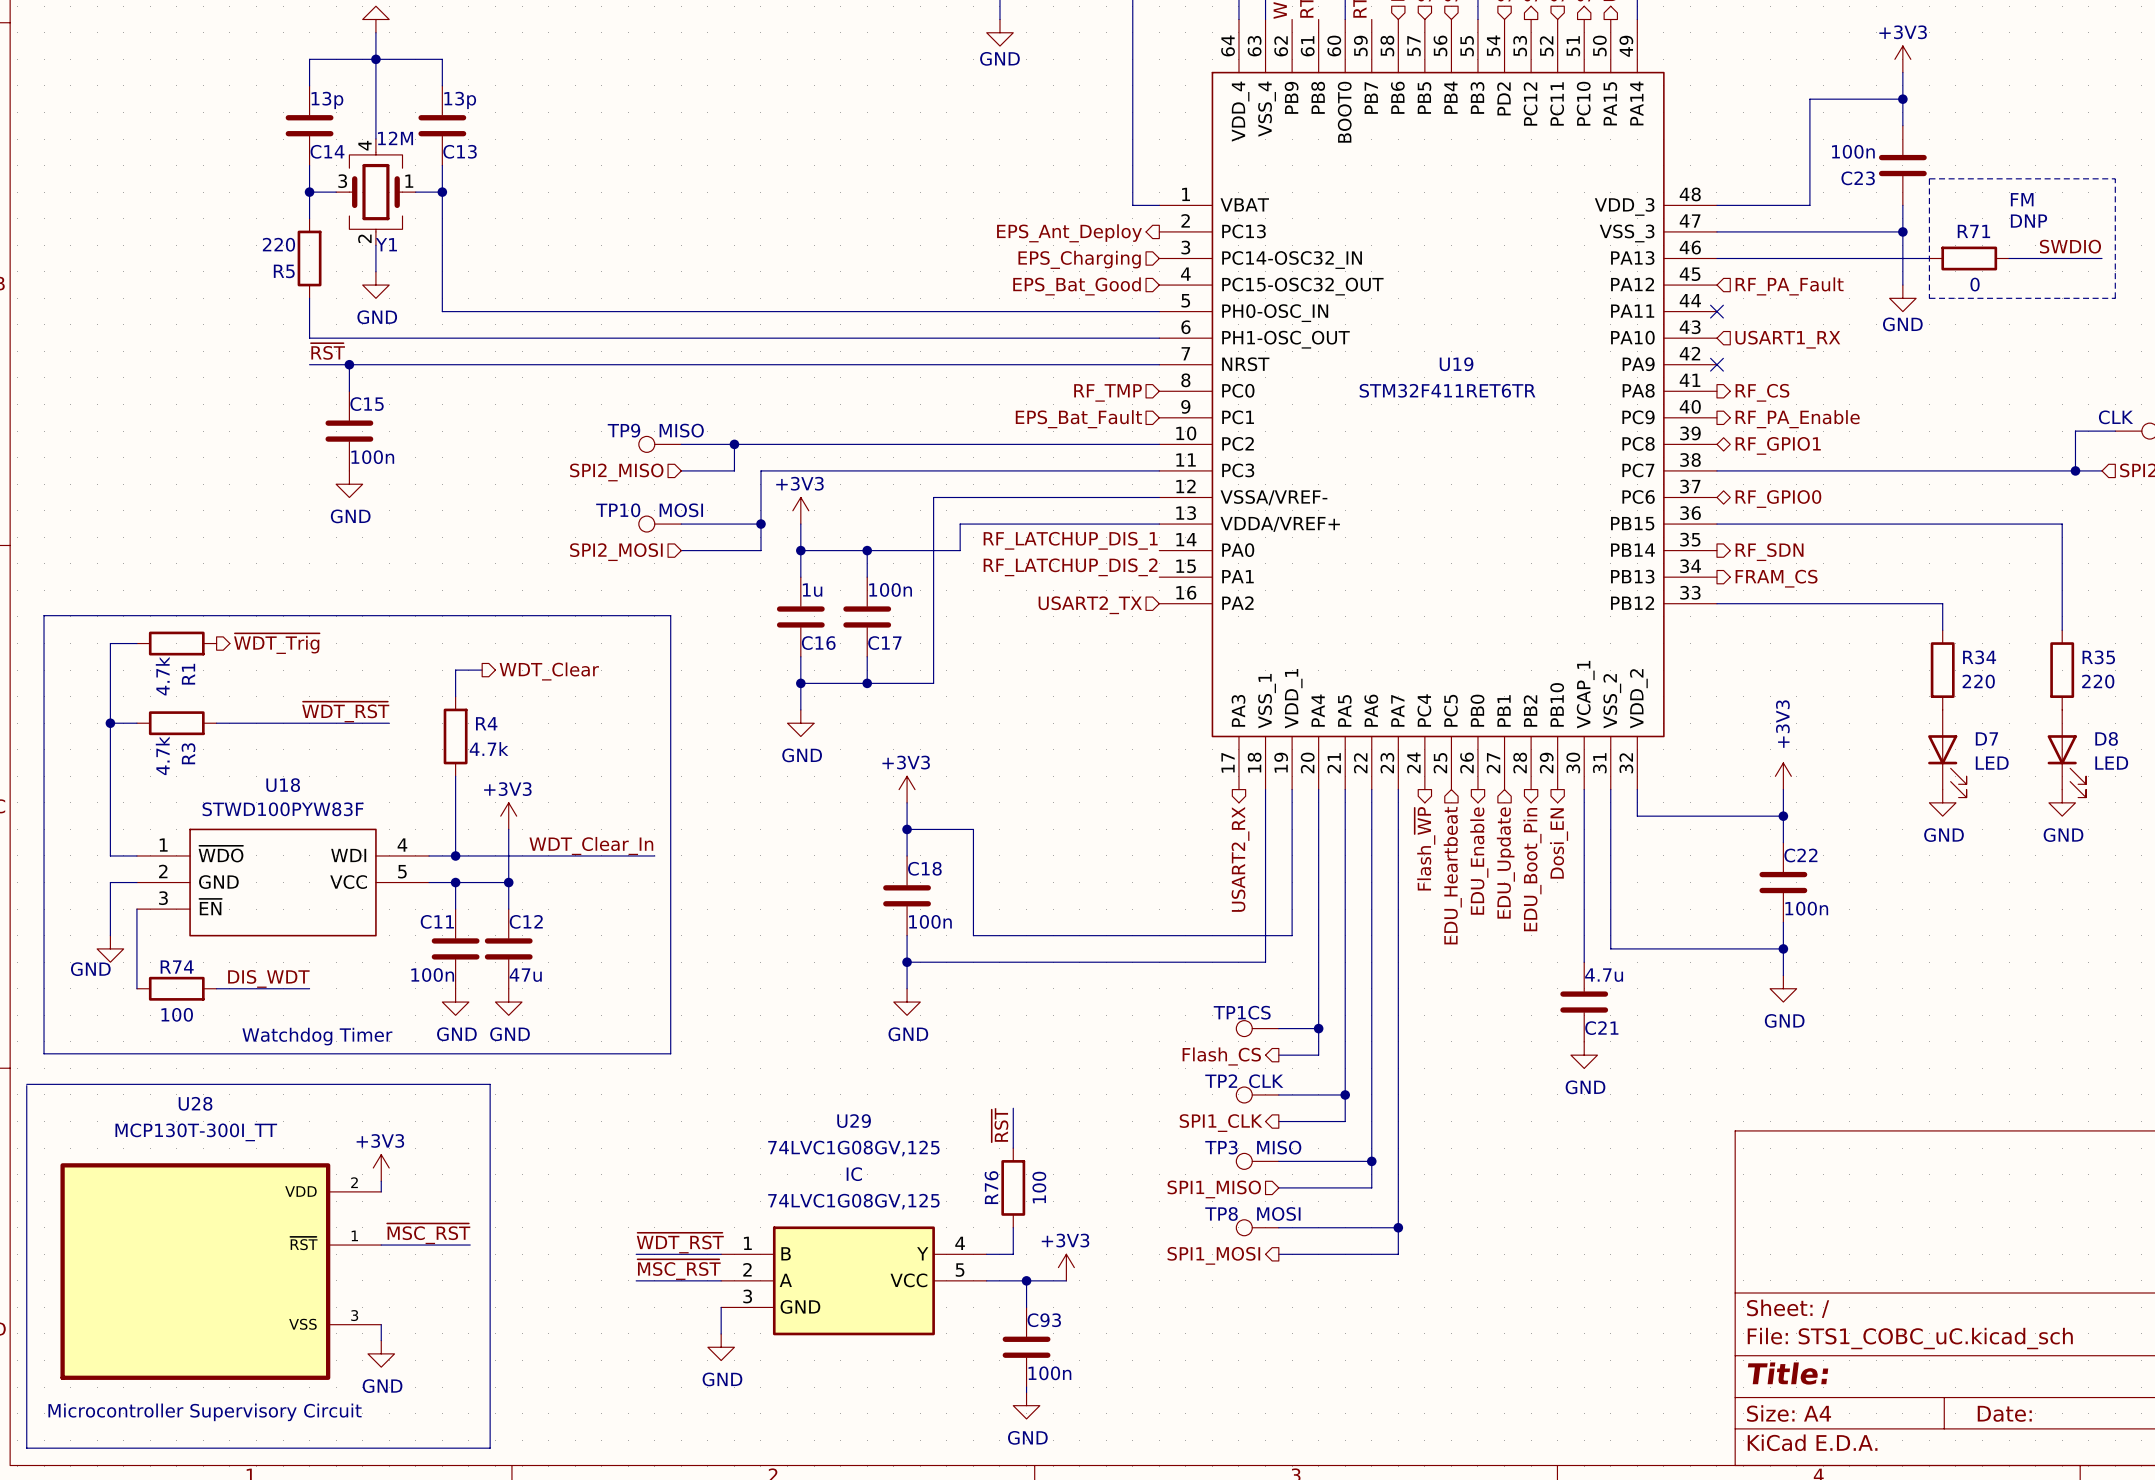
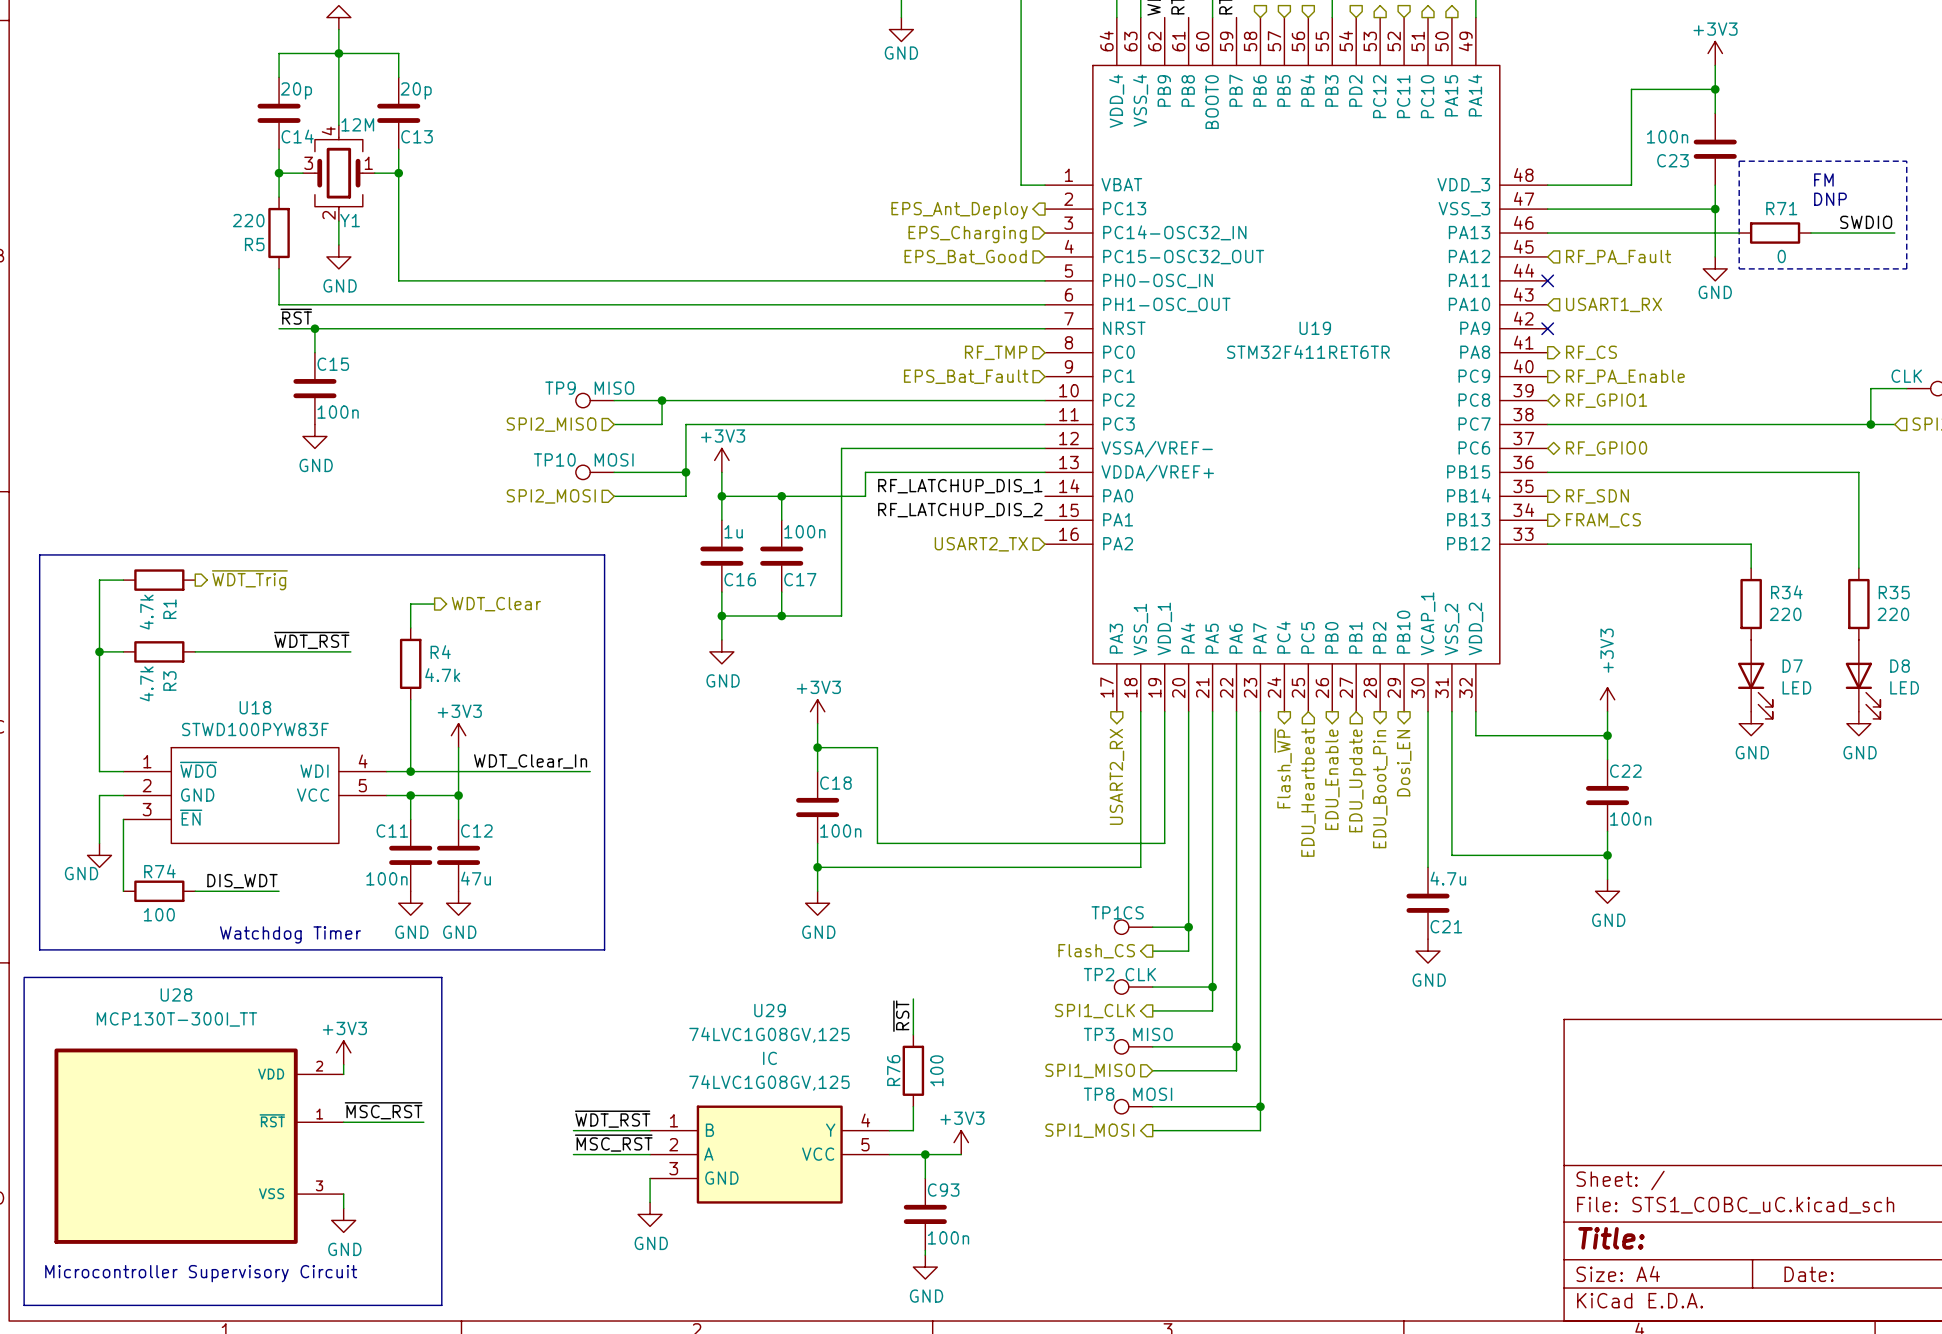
C14 value: 13p (327, 100) -> 20p (296, 90)
C13 value: 13p (460, 100) -> 20p (416, 90)

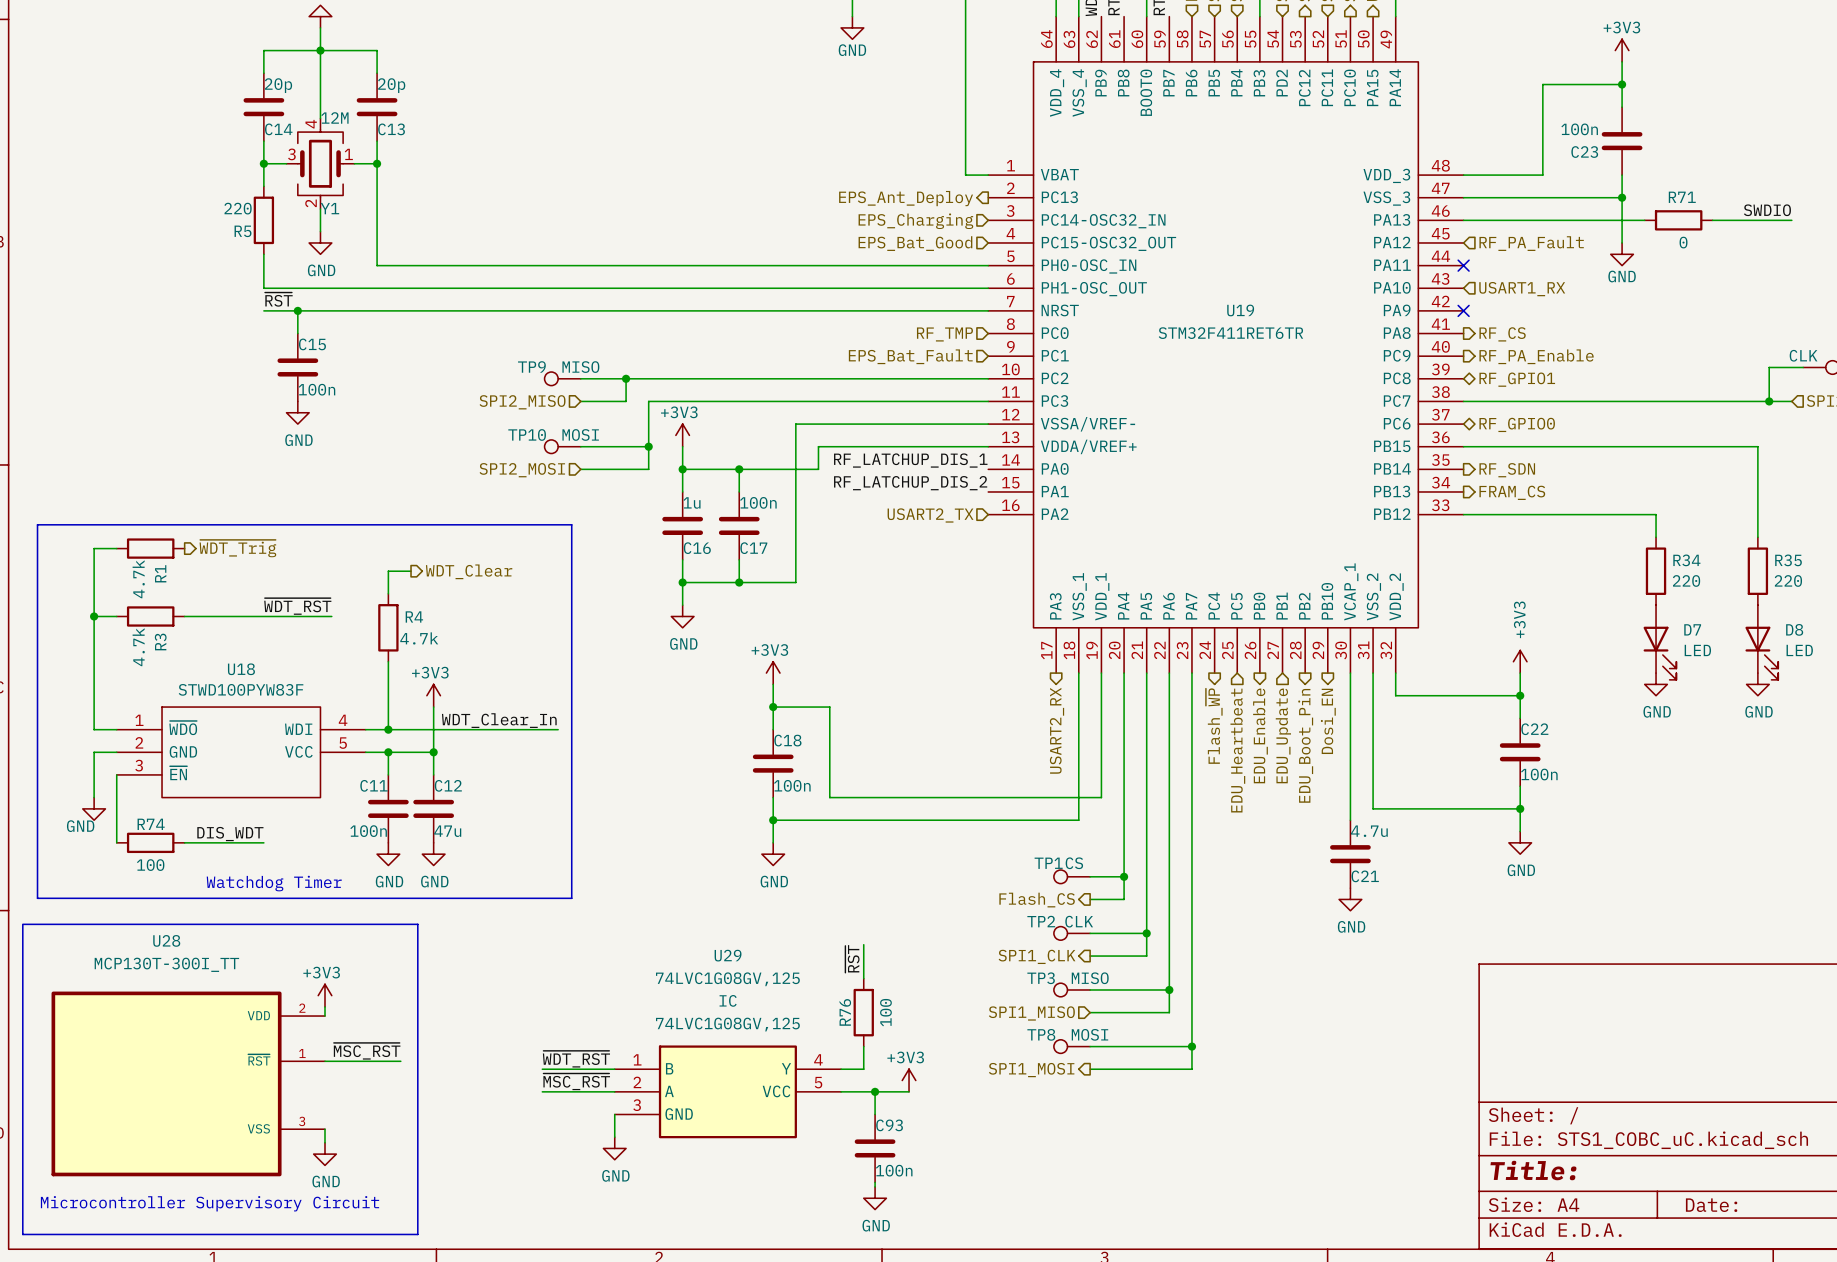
line: (1739, 161) (1906, 161) (1906, 268) (1739, 268) (1739, 161) -> none
text: FM (1823, 180) -> none
text: DNP (1830, 199) -> none

